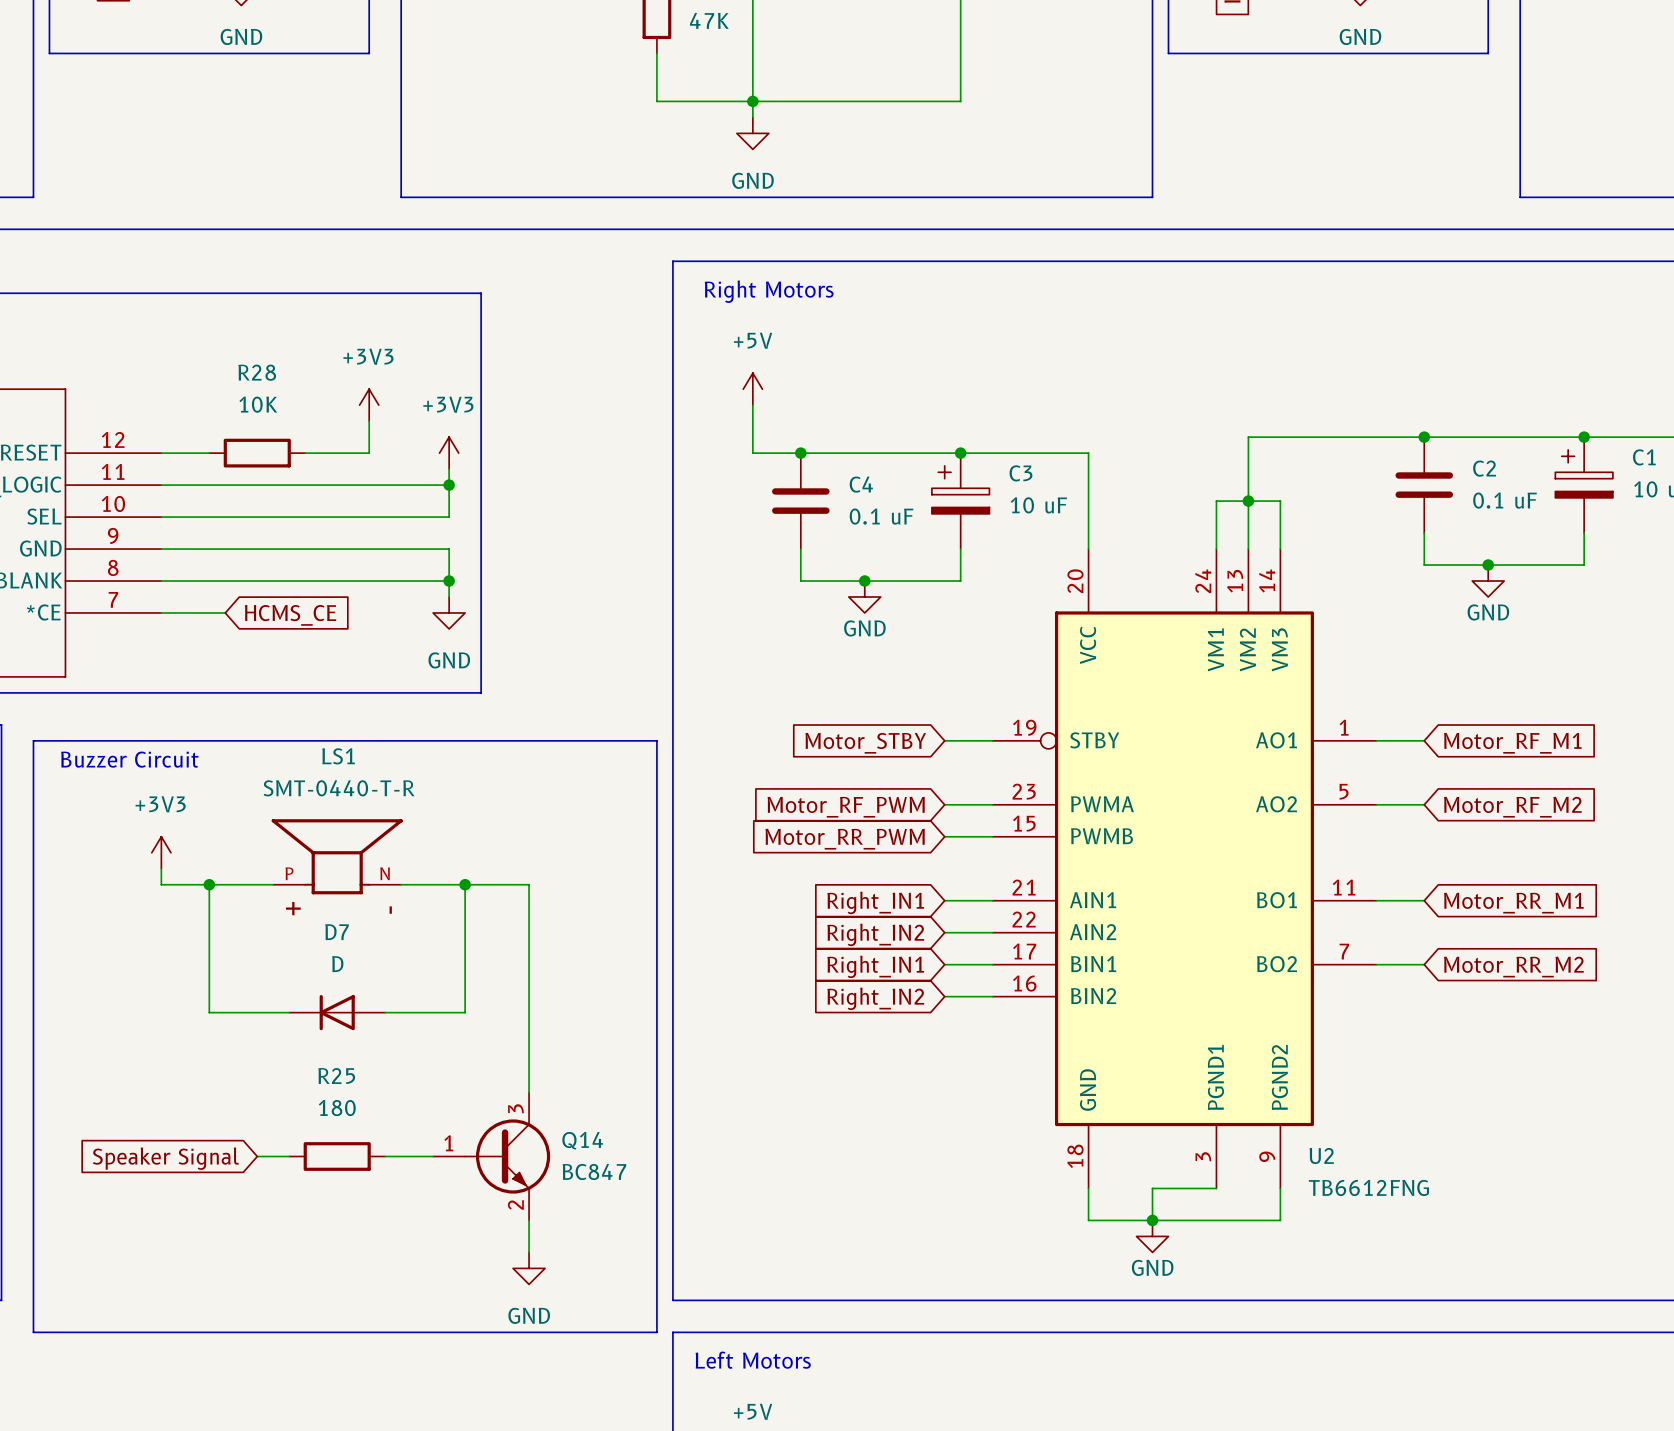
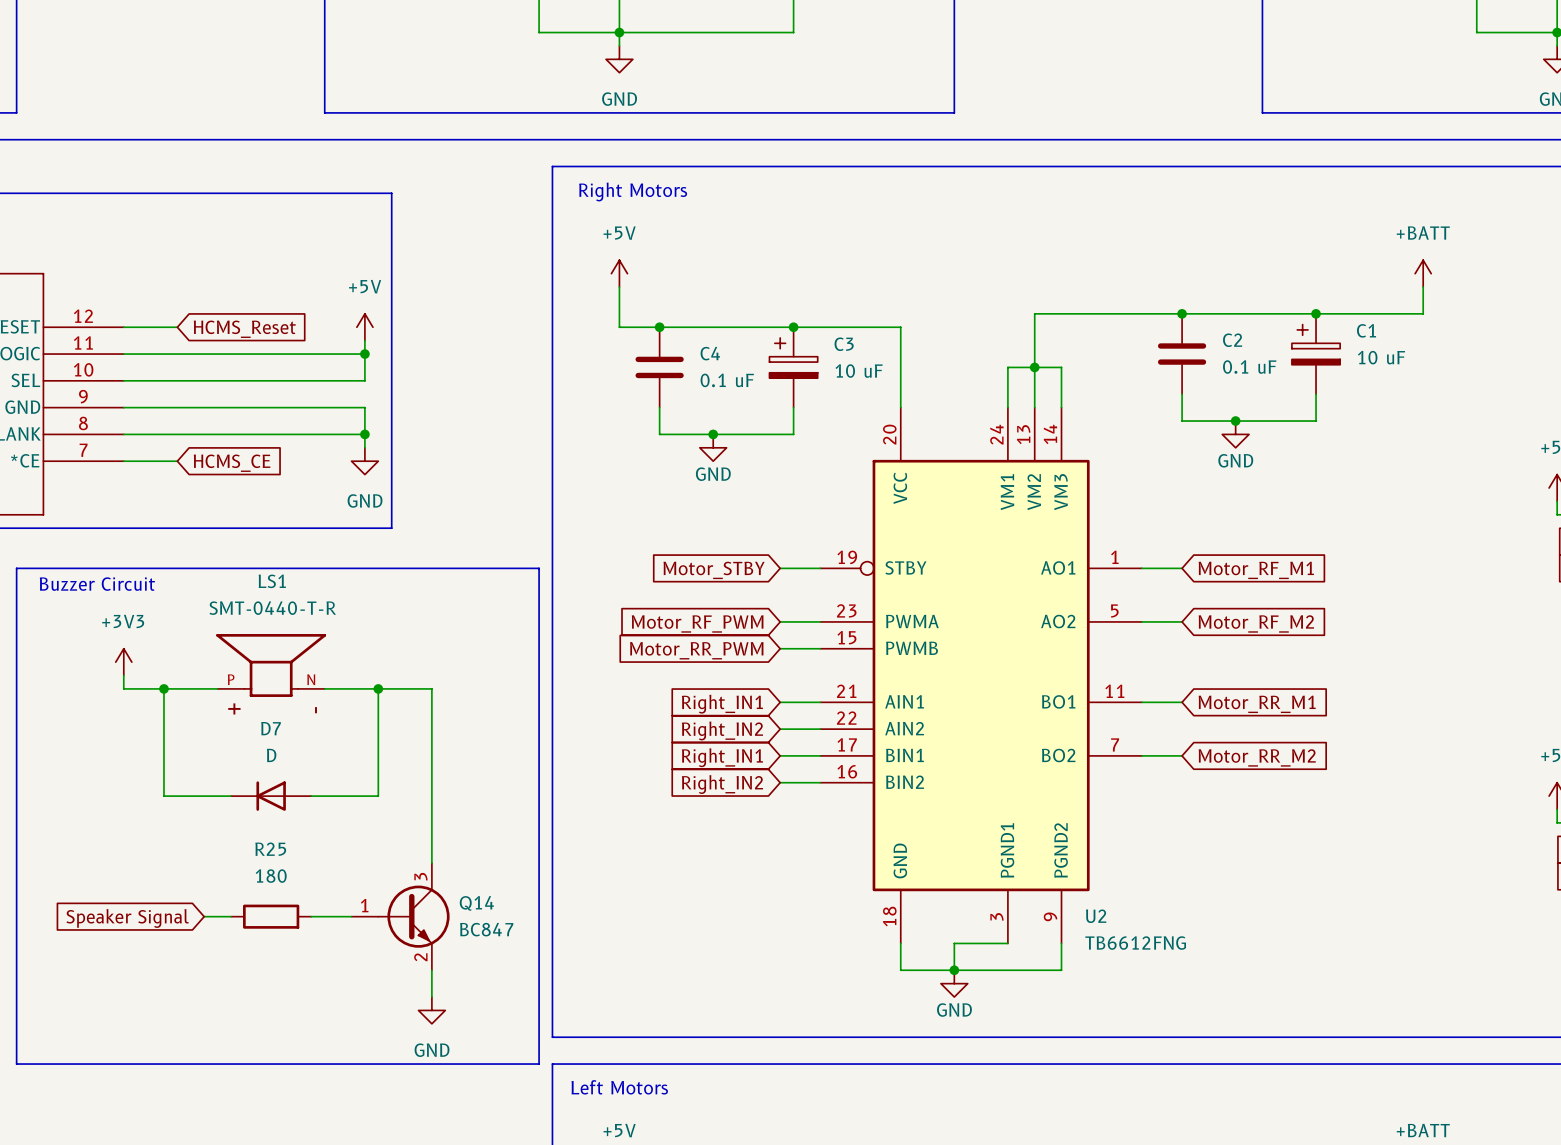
power symbol: +3V3 (369, 405) -> none
wire: (369, 421) (369, 453) (305, 453) -> none
R28: 10K (257, 453) -> none
power symbol: +3V3 (449, 453) -> +5V (364, 327)
global label: none -> HCMS_Reset (244, 329)

